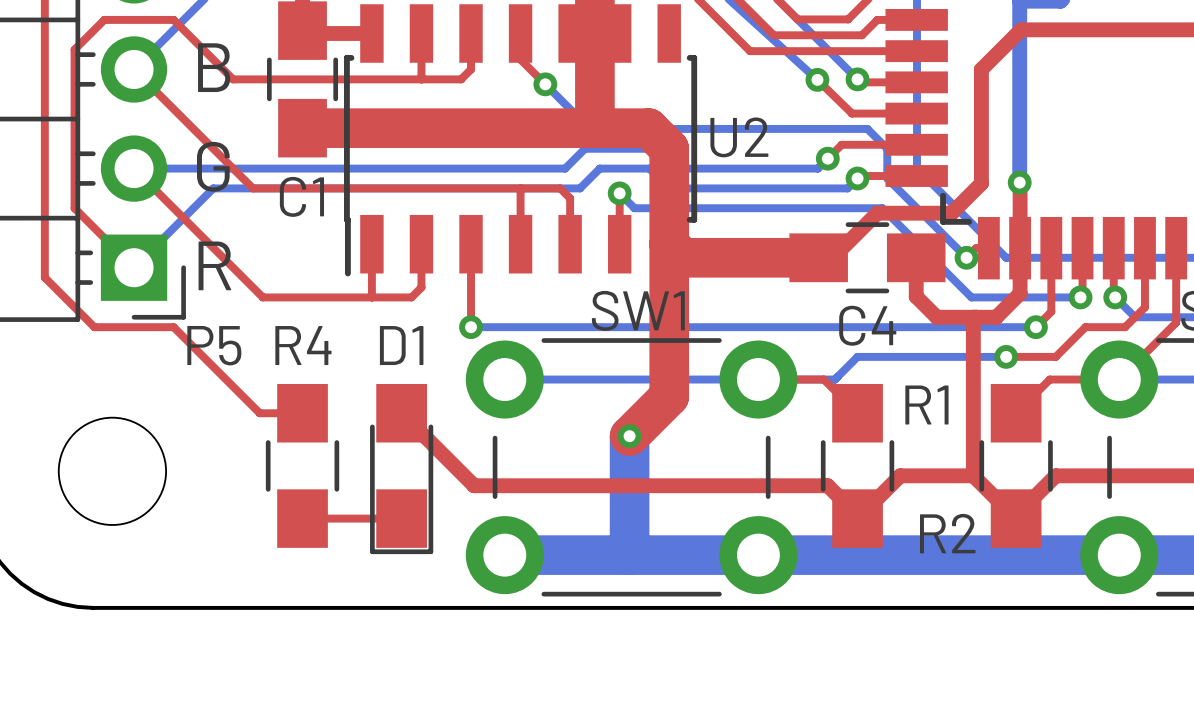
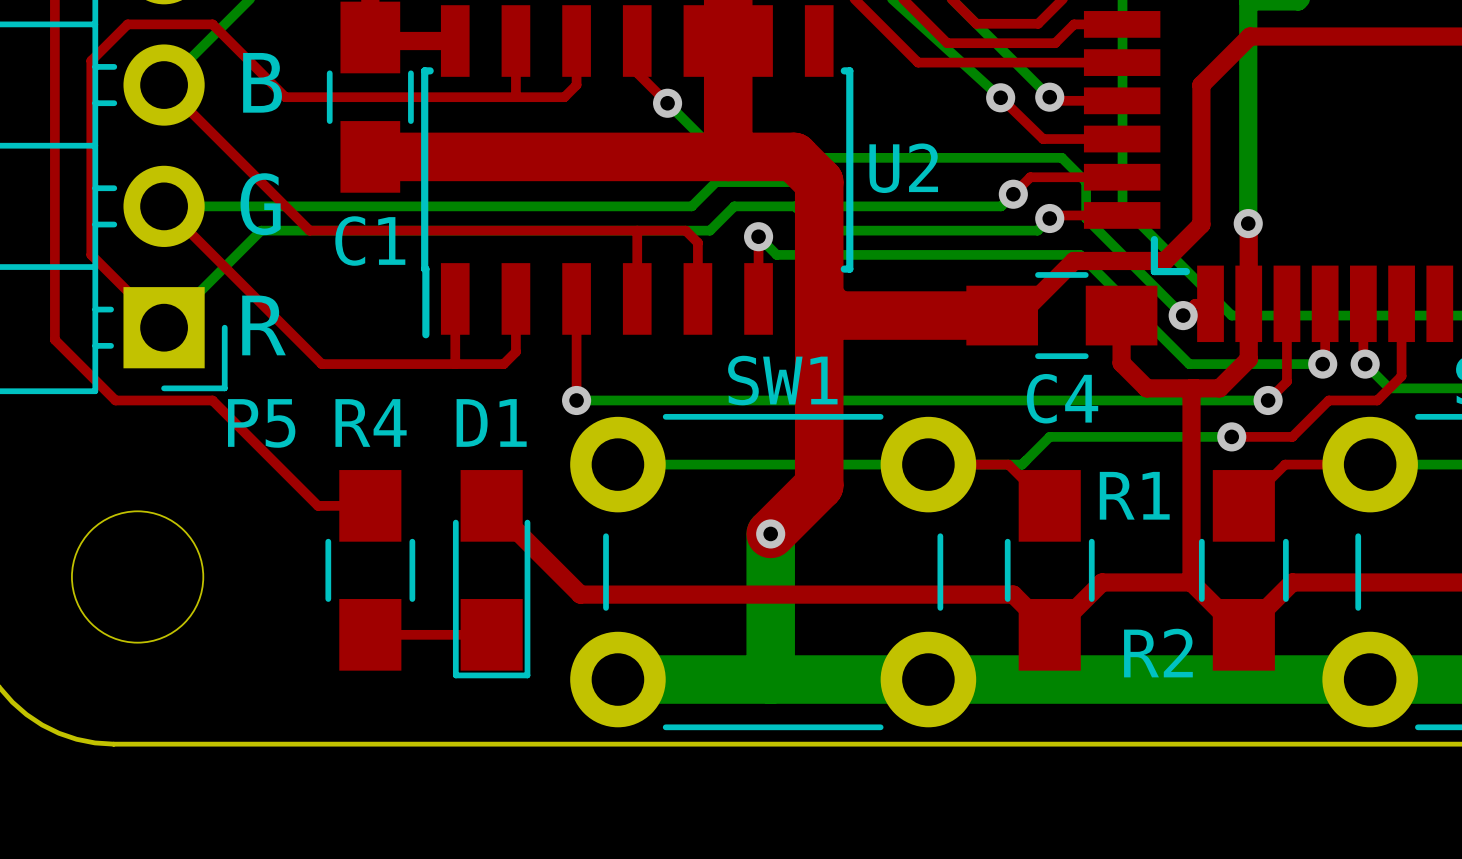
top track: (1176, 248) (1176, 322) (1119, 379) -> none

